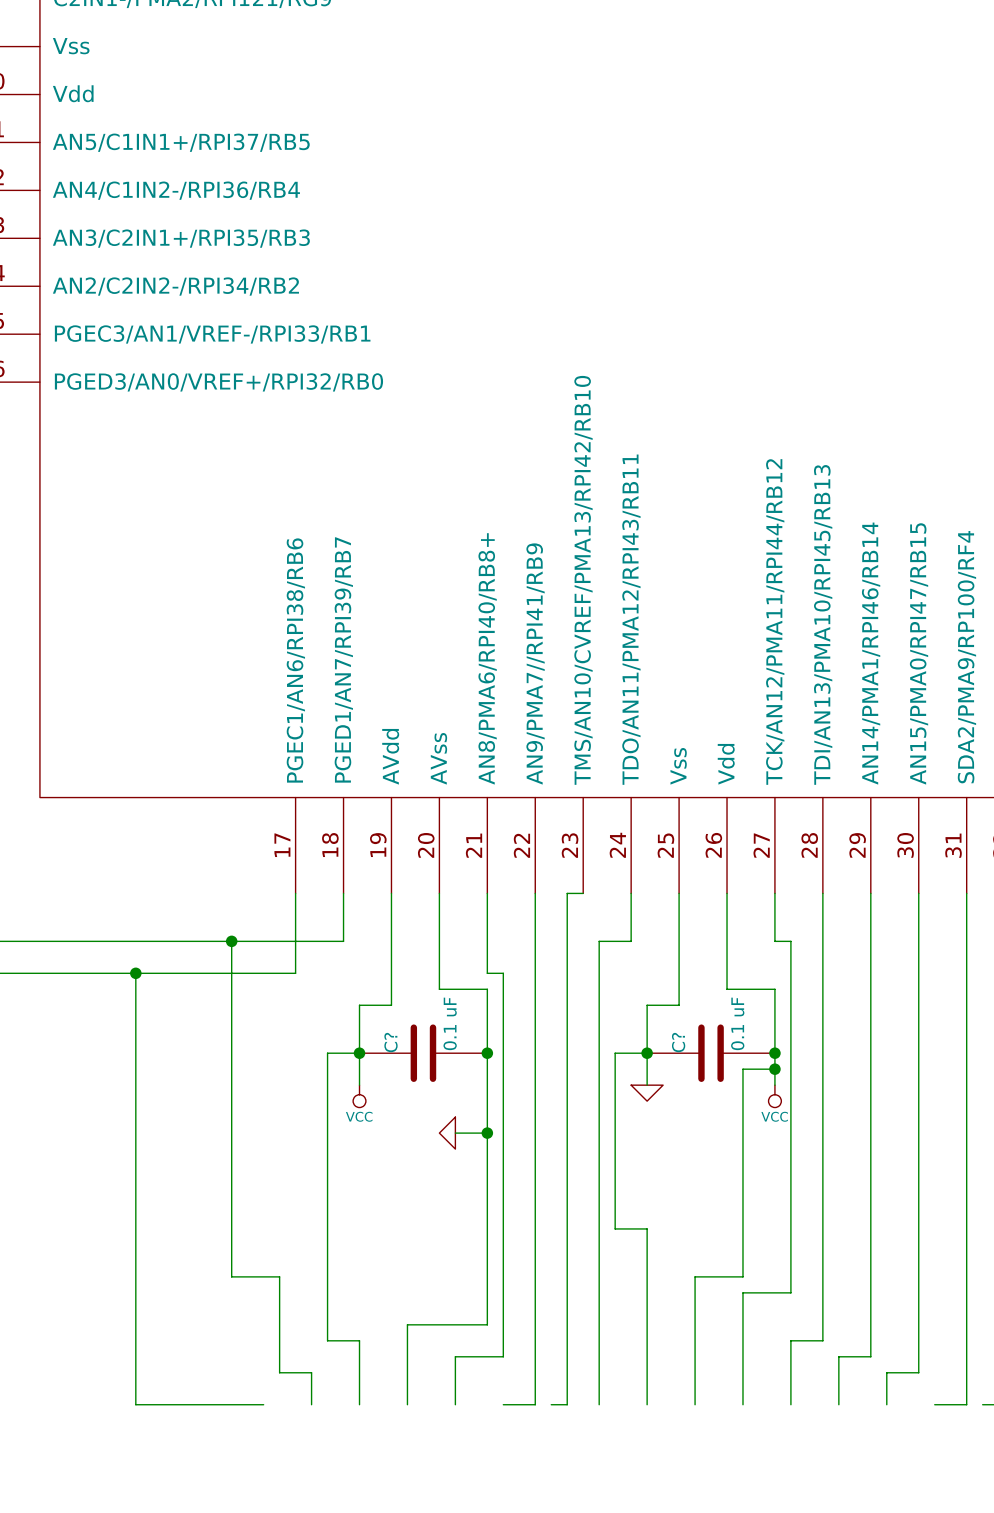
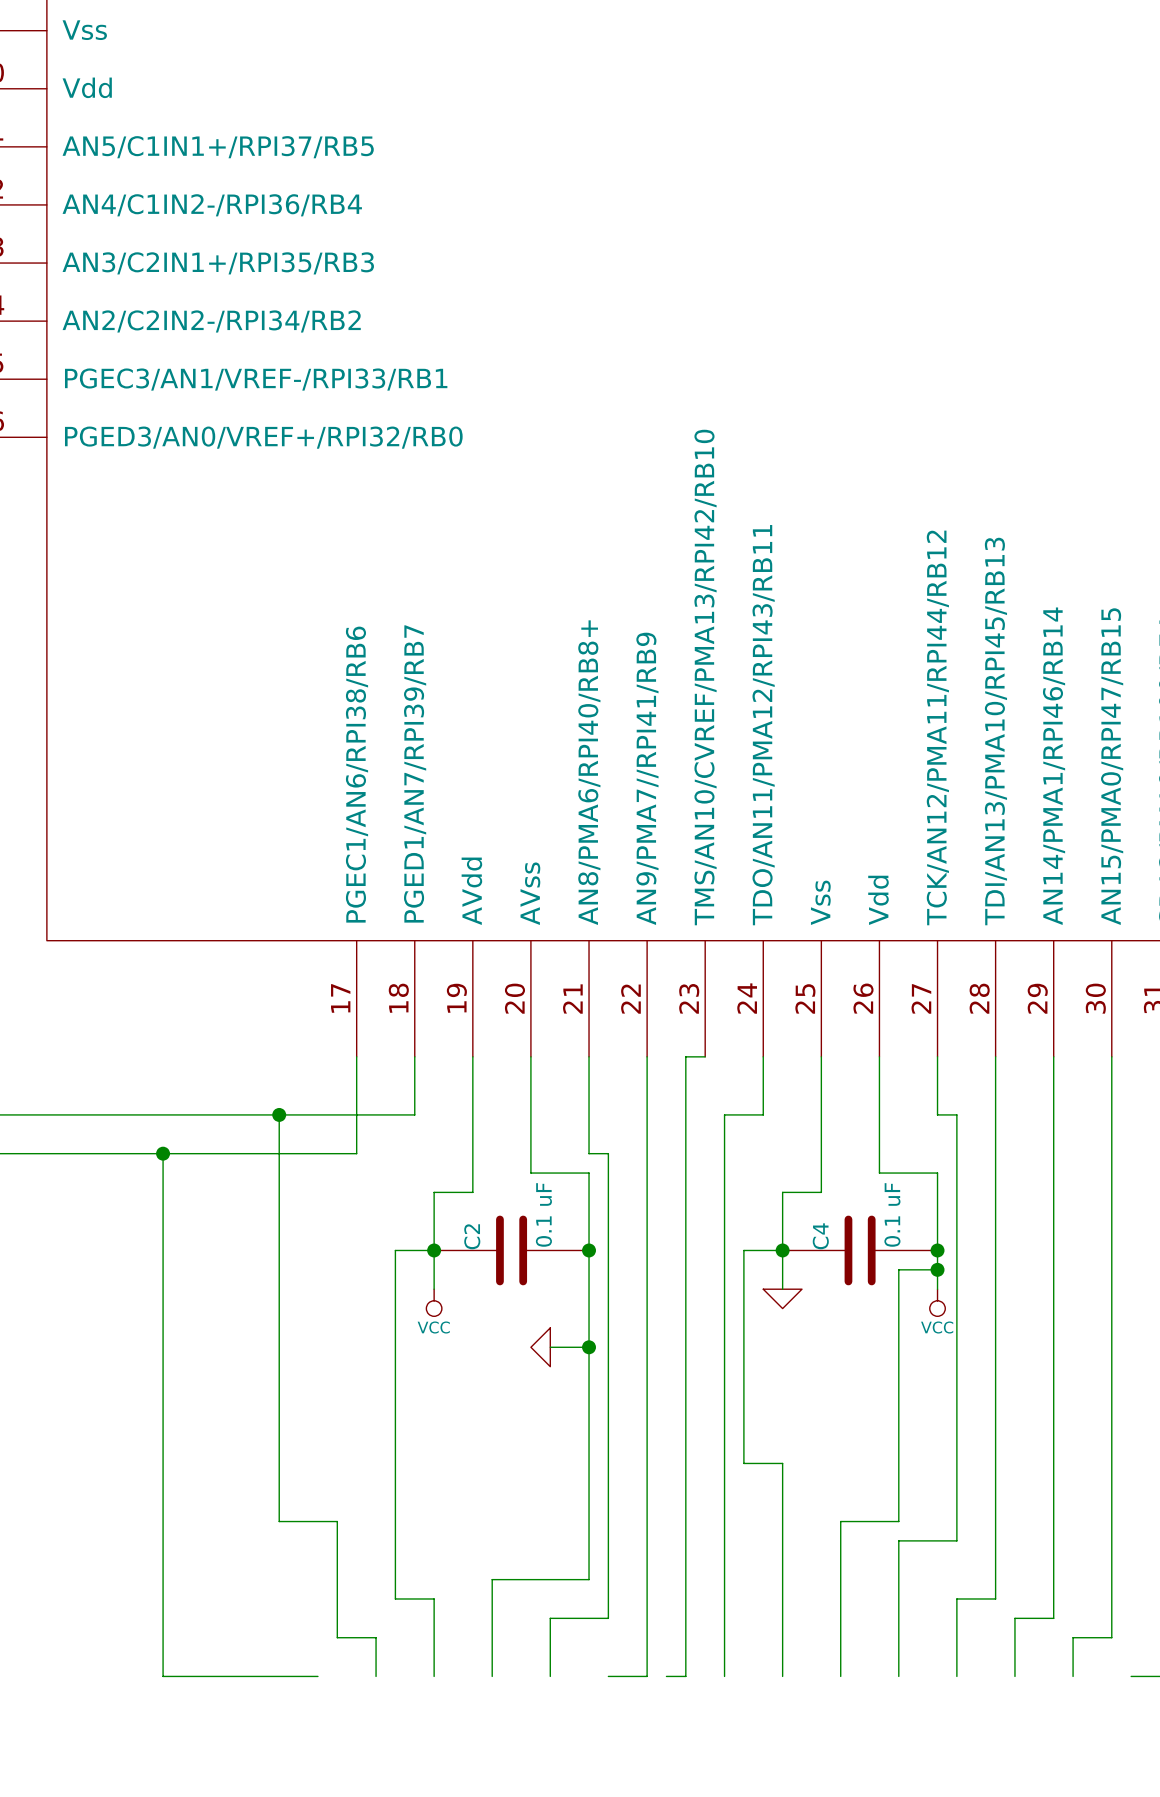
C? name: C? (391, 1042) -> C2 (472, 1236)
C? name: C? (678, 1042) -> C4 (820, 1236)

